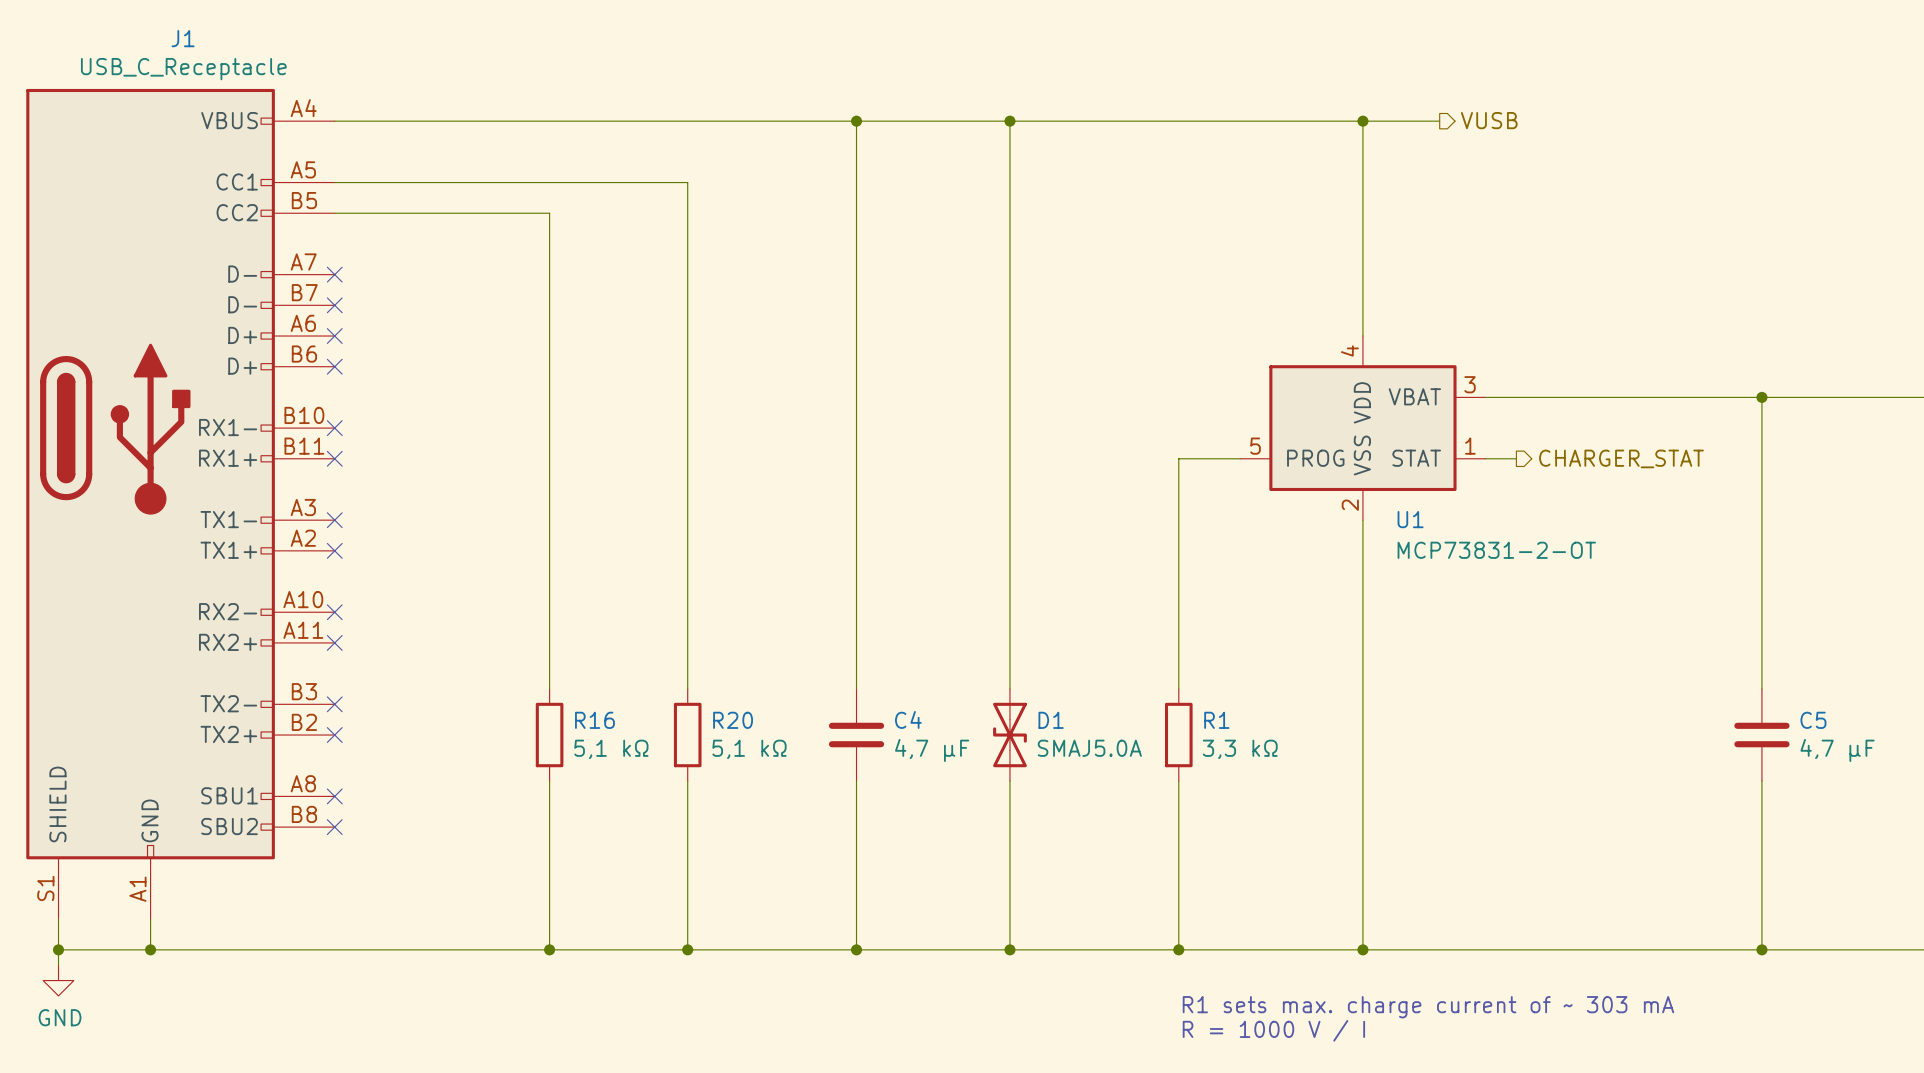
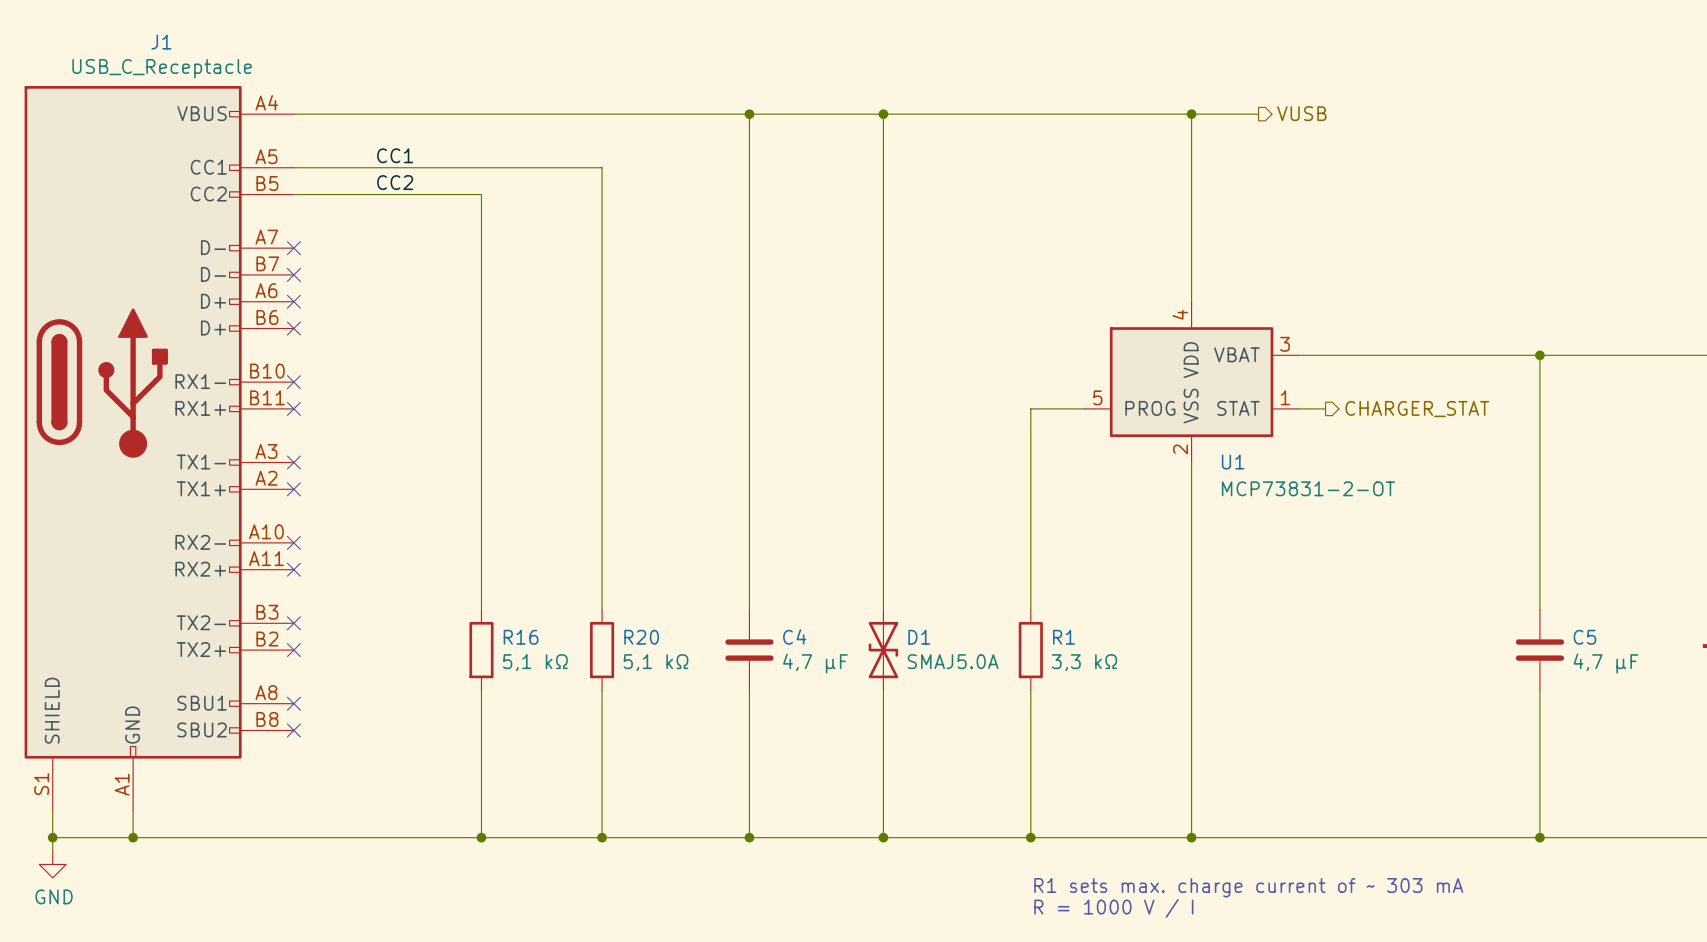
label: none -> CC1 (395, 155)
label: none -> CC2 (395, 182)

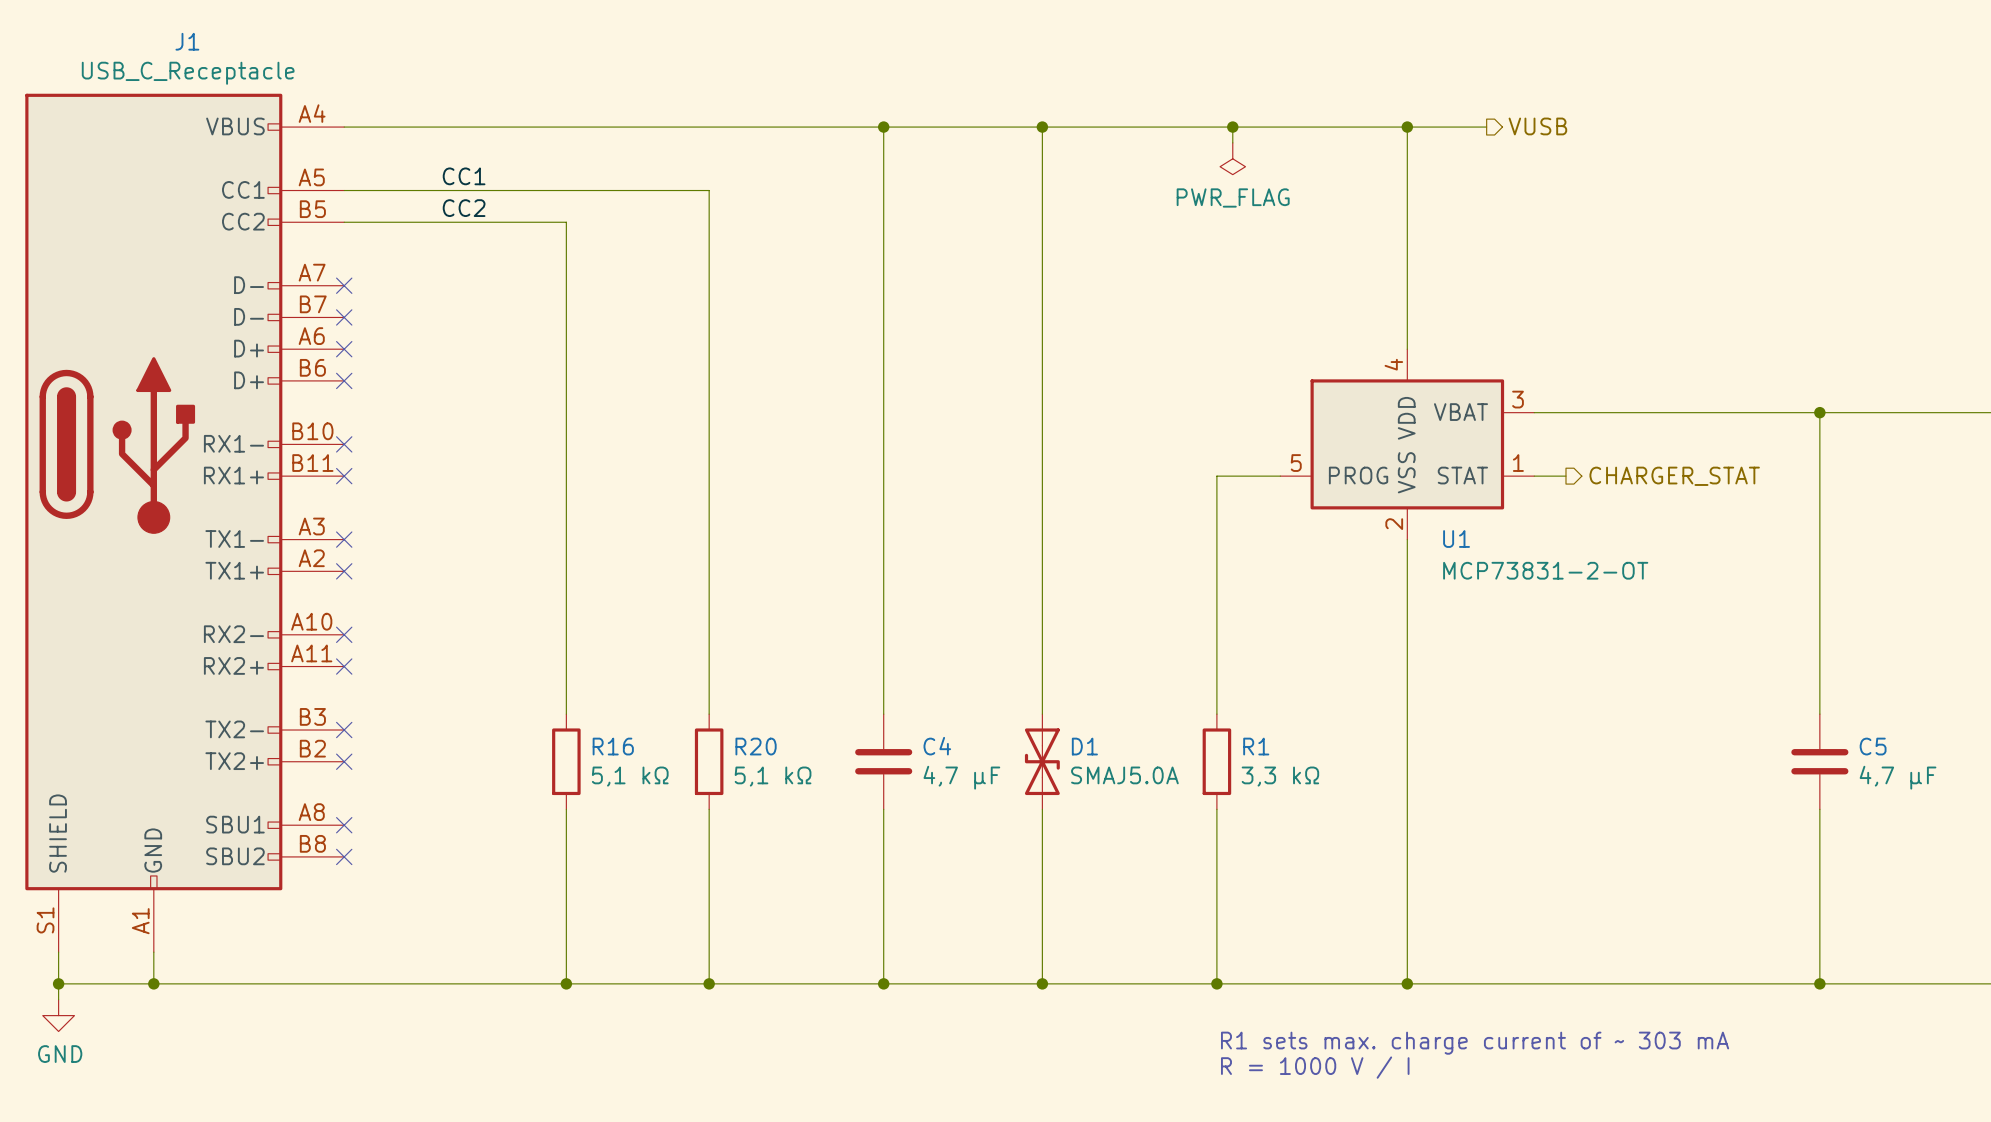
wire: none -> (1232, 127) (1232, 142)
junction: none -> (1232, 127)
power symbol: none -> PWR_FLAG (1232, 158)

